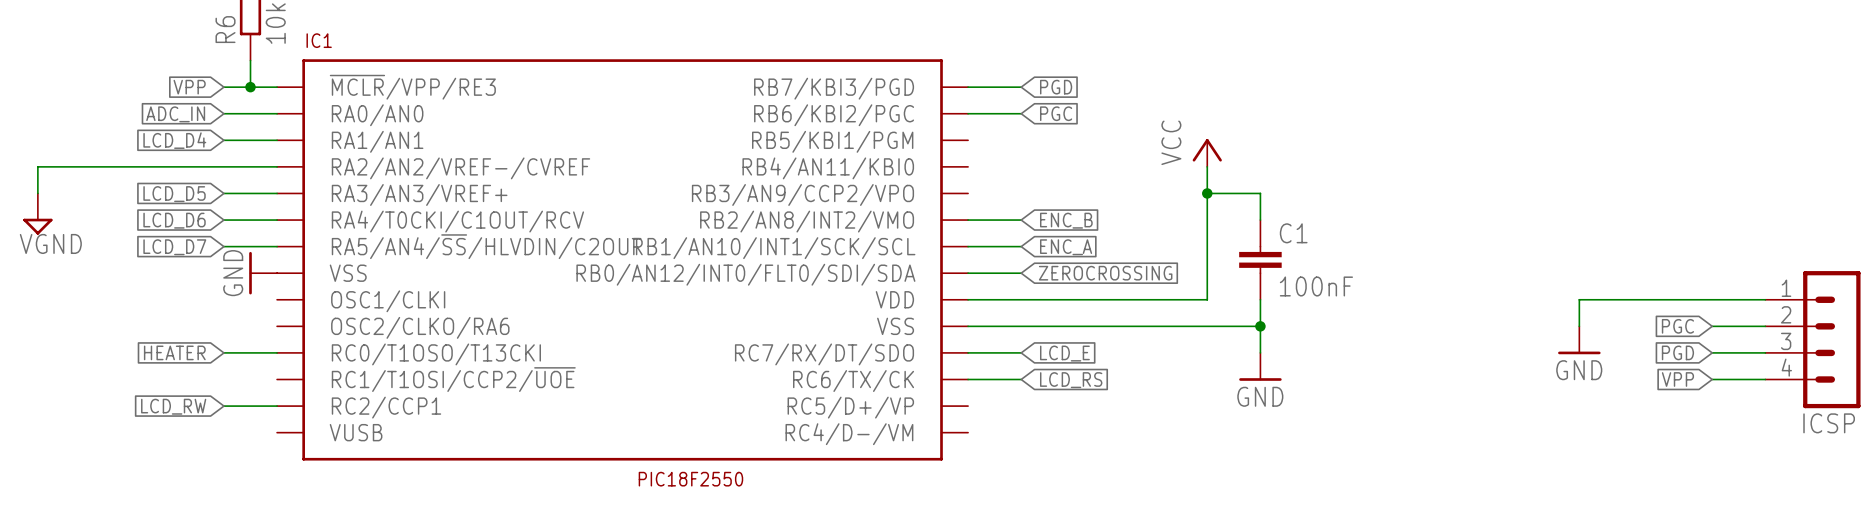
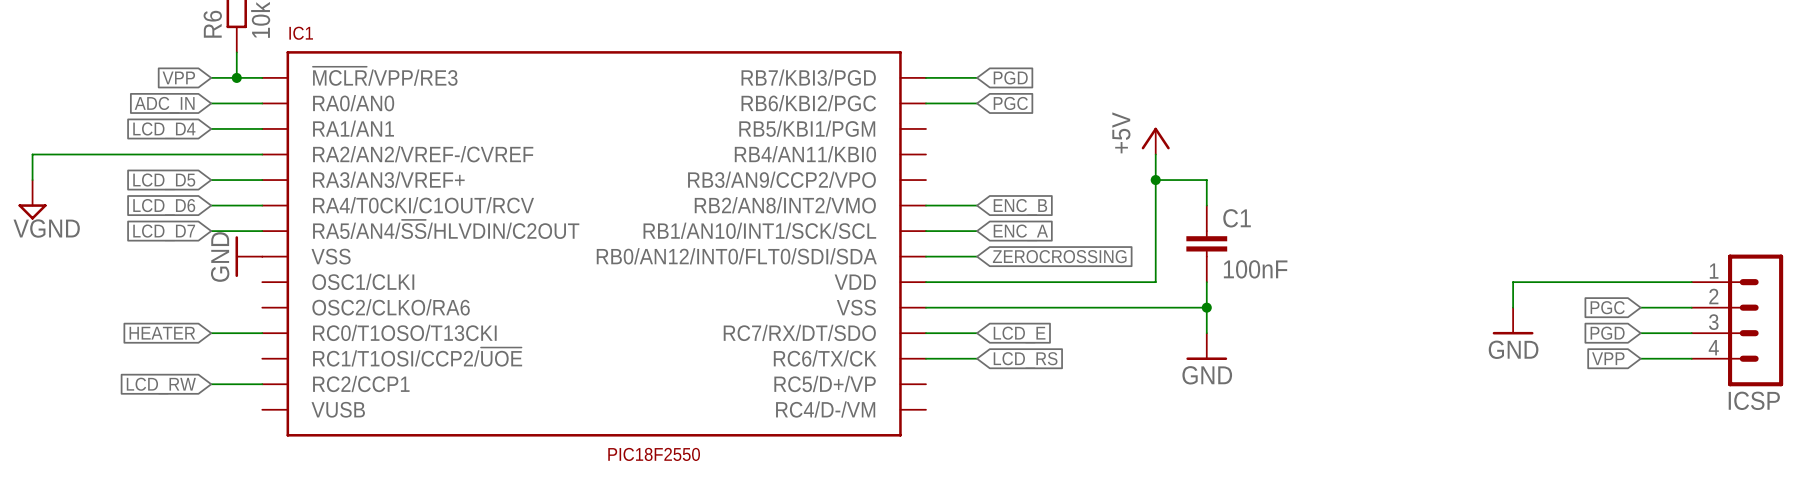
power symbol: VCC (1207, 152) -> +5V (1155, 141)

